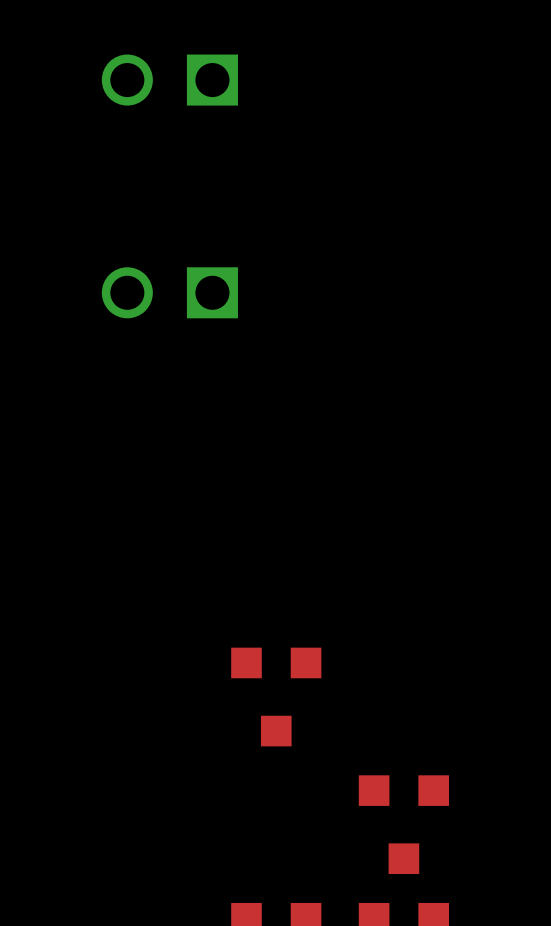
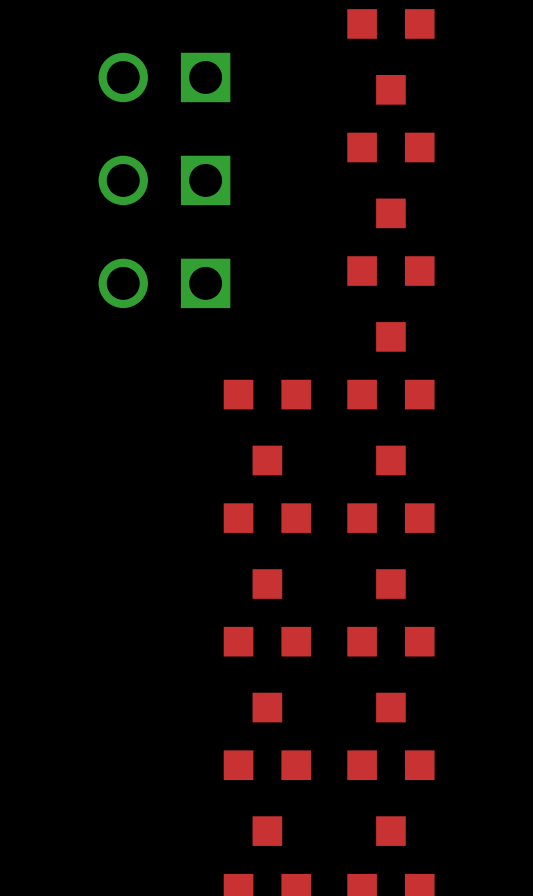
part: none -> (390, 56)
part: none -> (164, 180)
part: none -> (390, 180)
part: none -> (390, 303)
part: none -> (267, 427)
part: none -> (390, 427)
part: none -> (267, 551)
part: none -> (390, 551)
part: none -> (390, 674)
part: none -> (267, 798)

